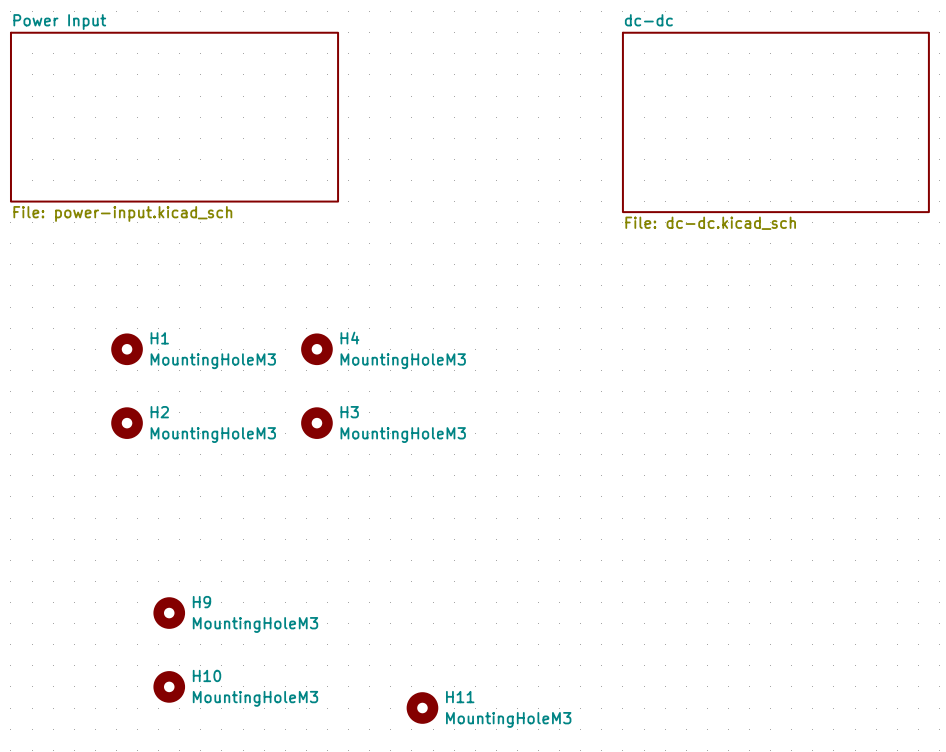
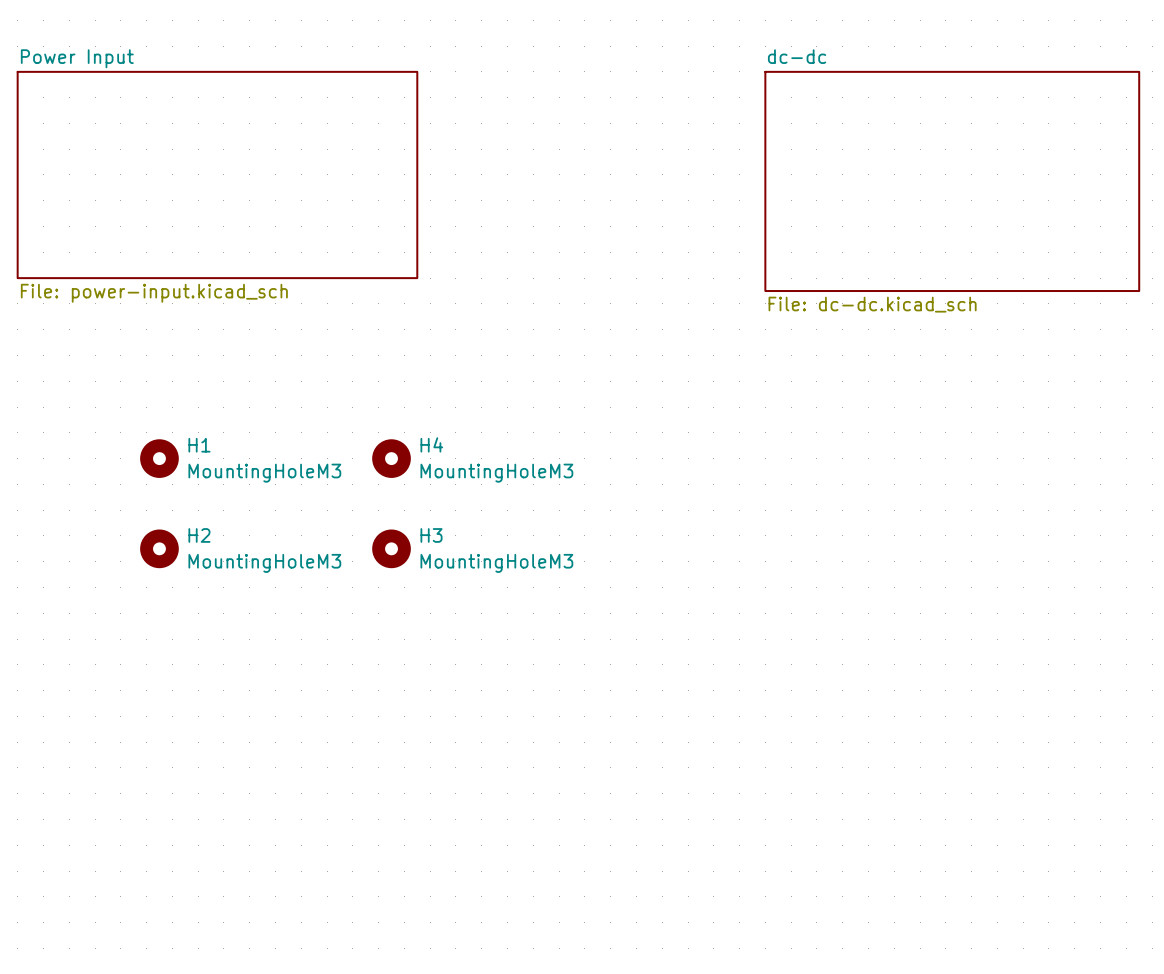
H9: MountingHoleM3 (169, 613) -> none
H10: MountingHoleM3 (169, 686) -> none
H11: MountingHoleM3 (422, 708) -> none

